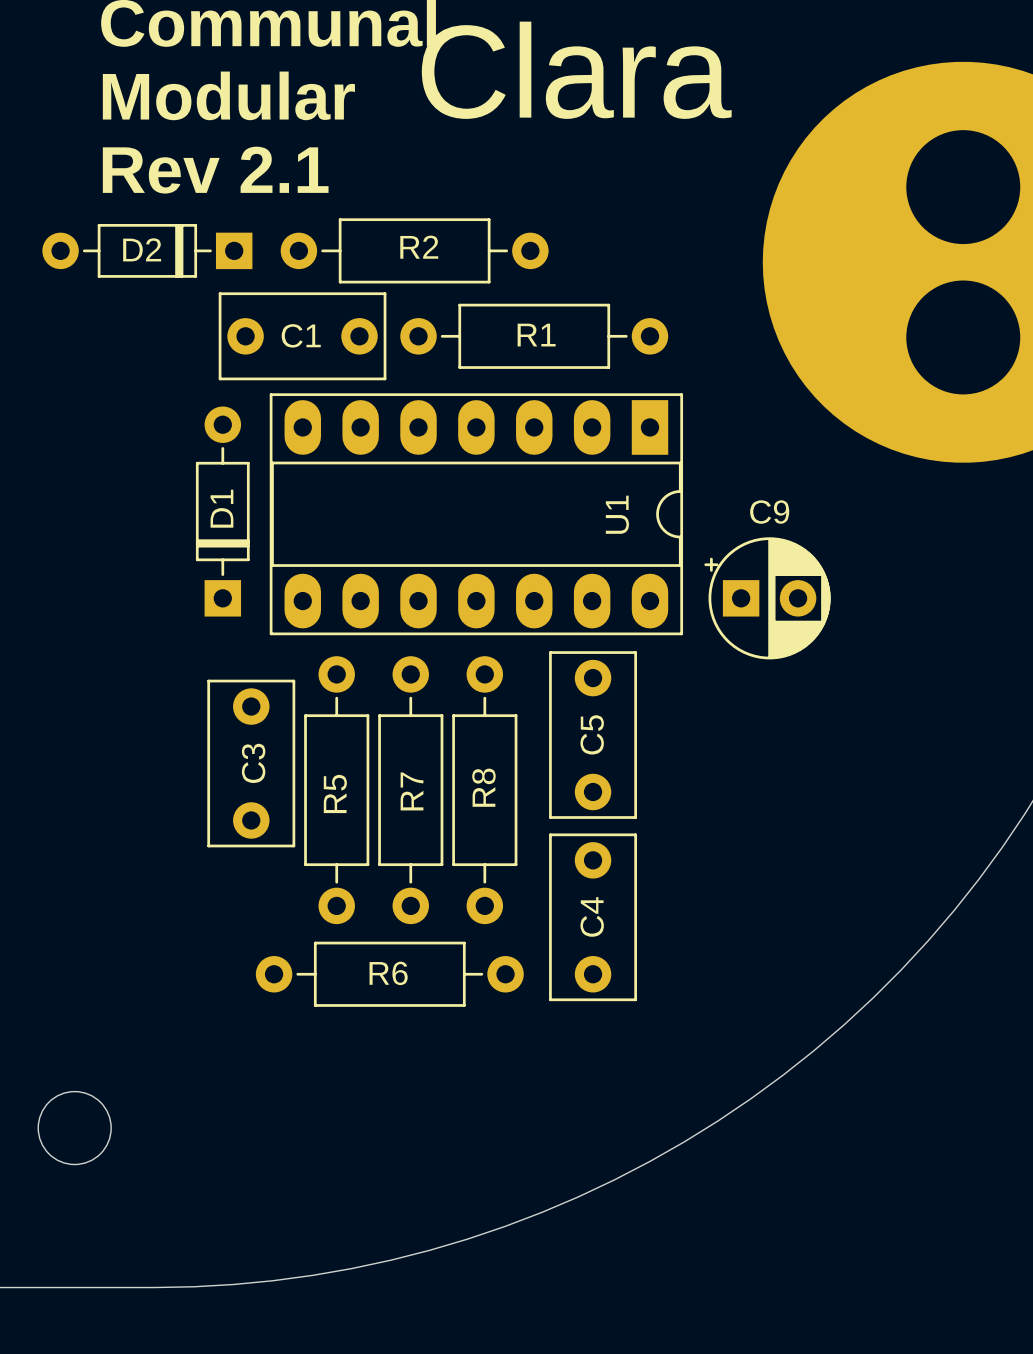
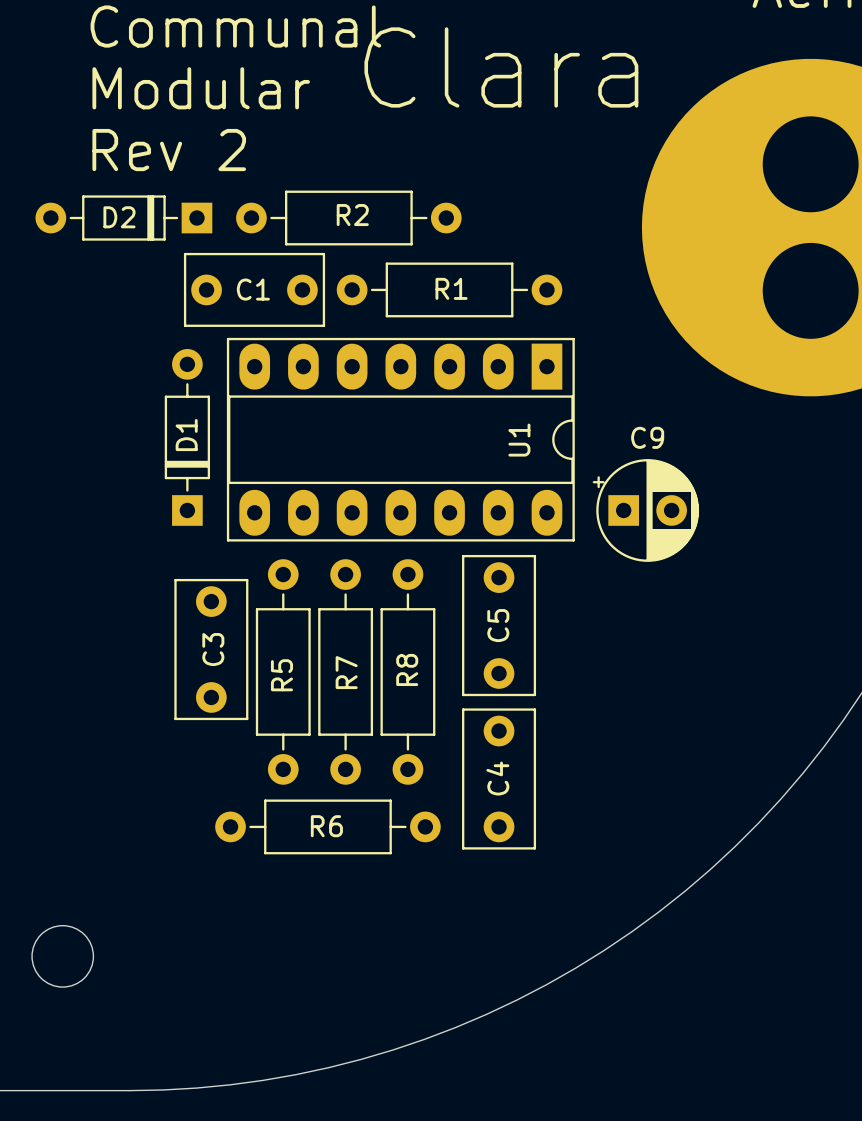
text: Rev 2.1 (215, 170) -> Rev 2 (169, 150)

